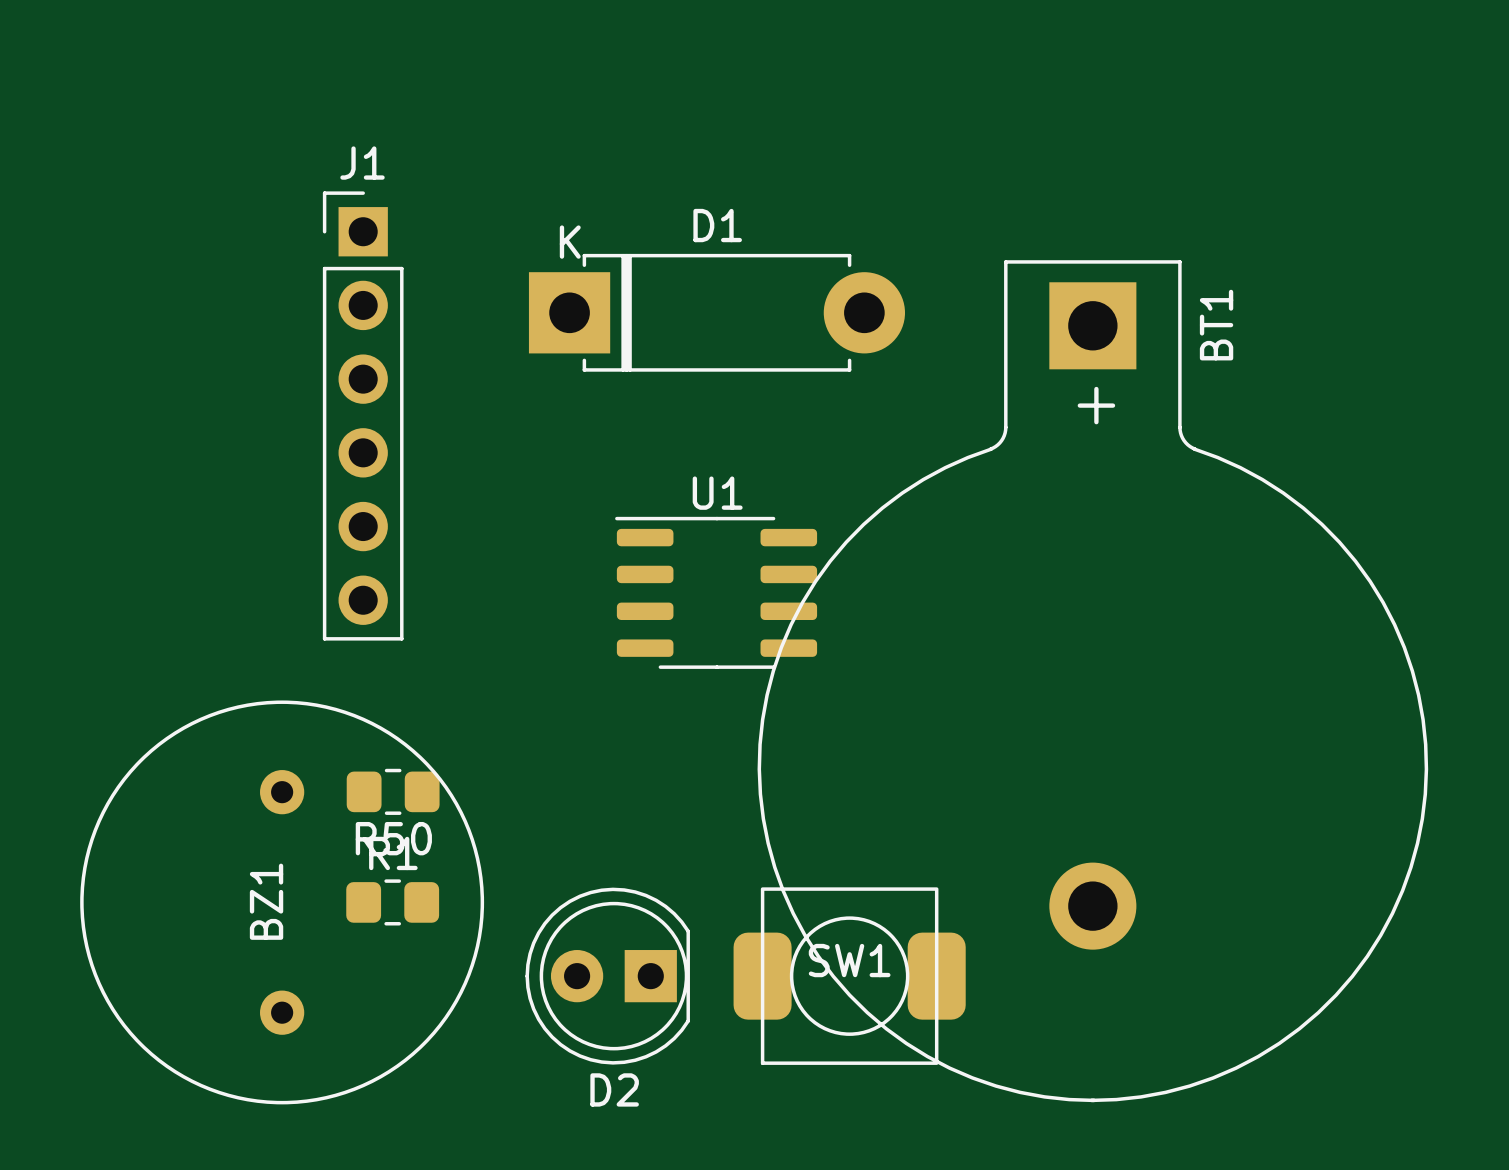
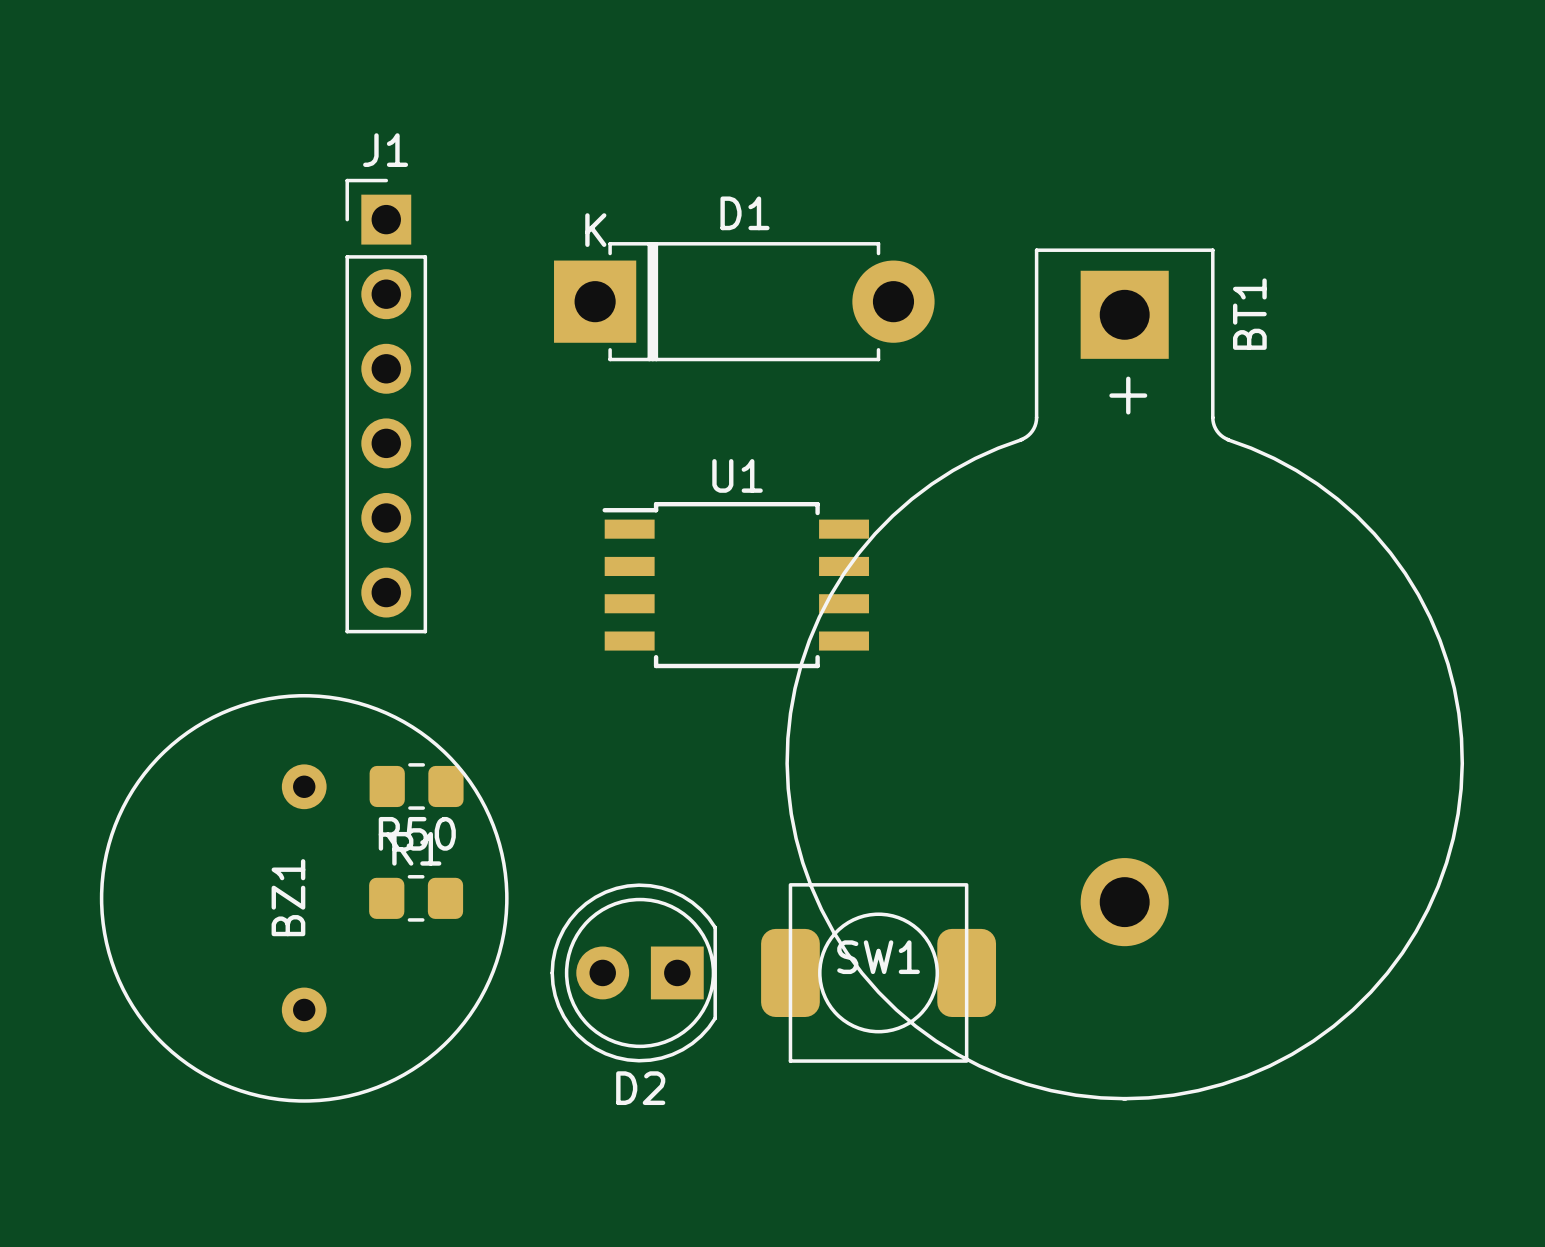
U1 footprint: [615, 516, 818, 669] -> [602, 501, 869, 669]

